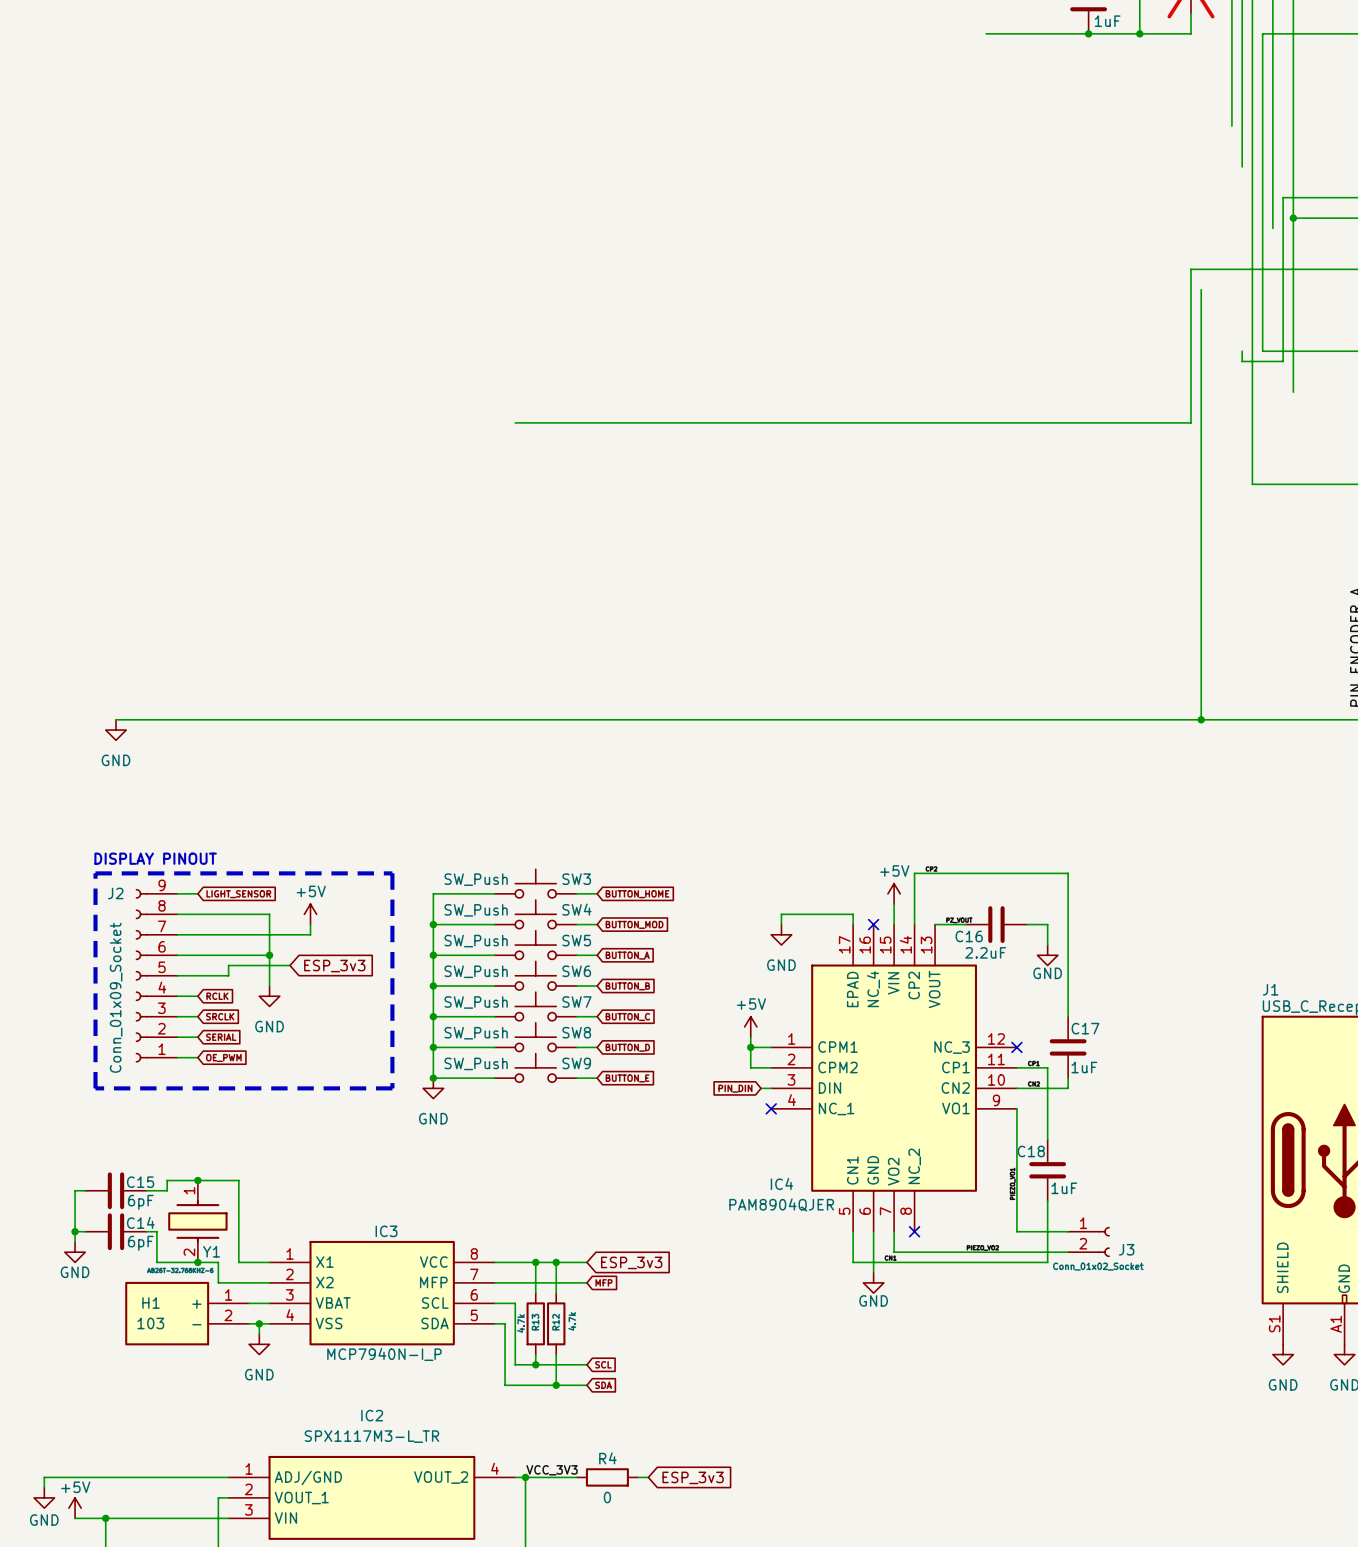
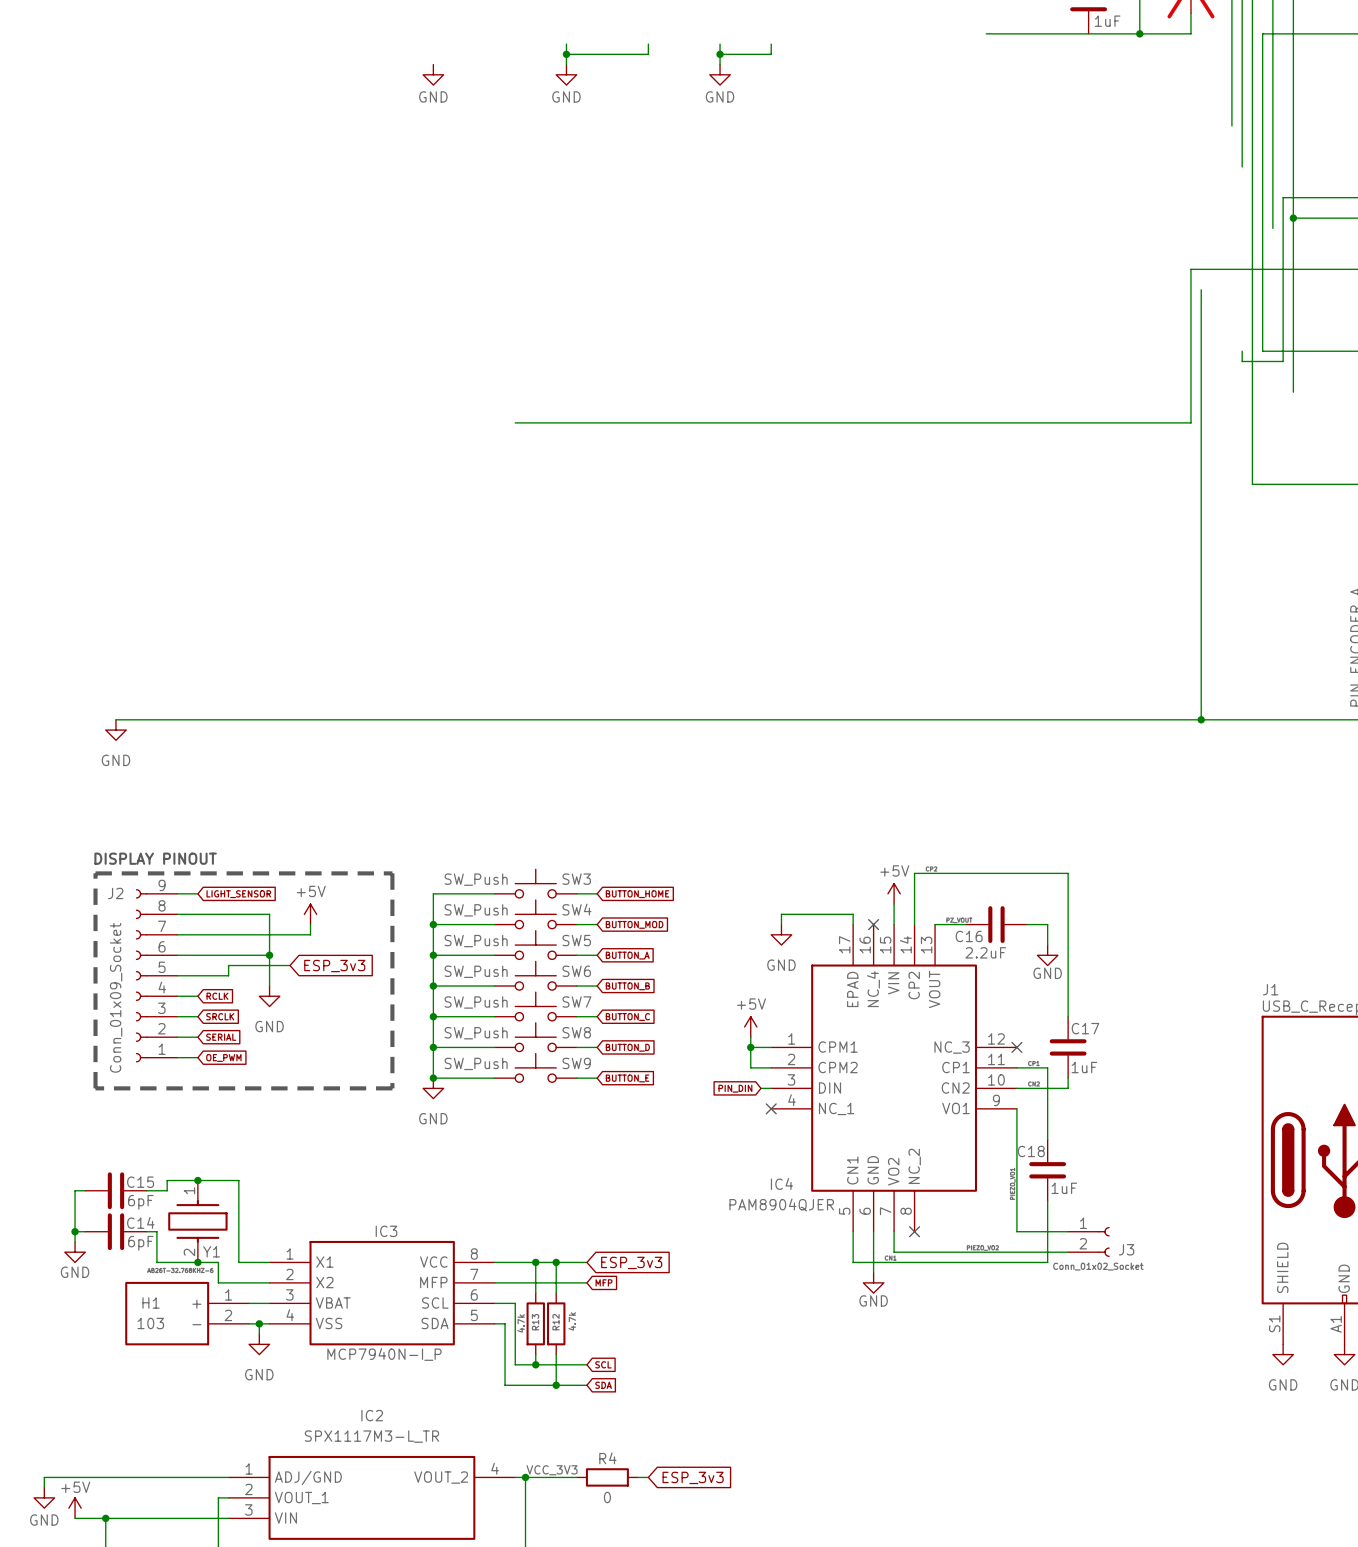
junction: (1088, 33) -> none
wire: none -> (566, 44) (566, 64)
wire: none -> (648, 44) (648, 54) (566, 54)
wire: none -> (720, 44) (720, 64)
wire: none -> (771, 44) (771, 54) (720, 54)
junction: none -> (566, 54)
junction: none -> (720, 54)
power symbol: none -> GND (433, 74)
power symbol: none -> GND (566, 74)
power symbol: none -> GND (720, 74)

